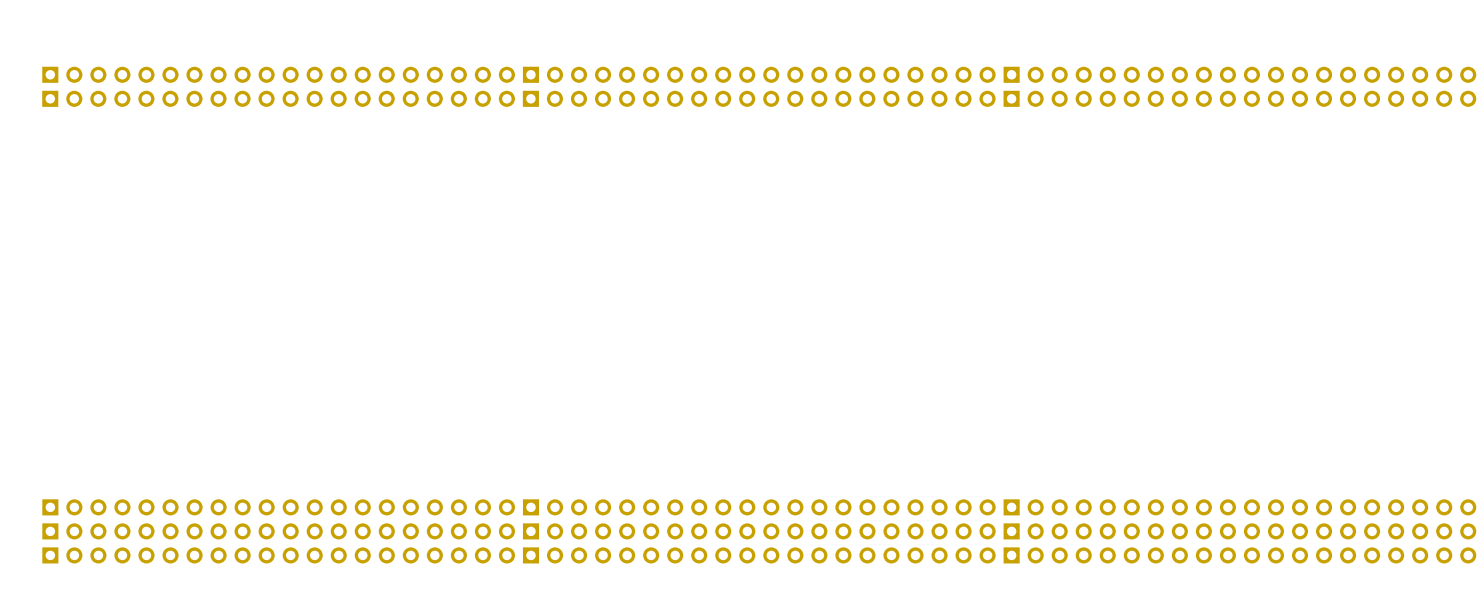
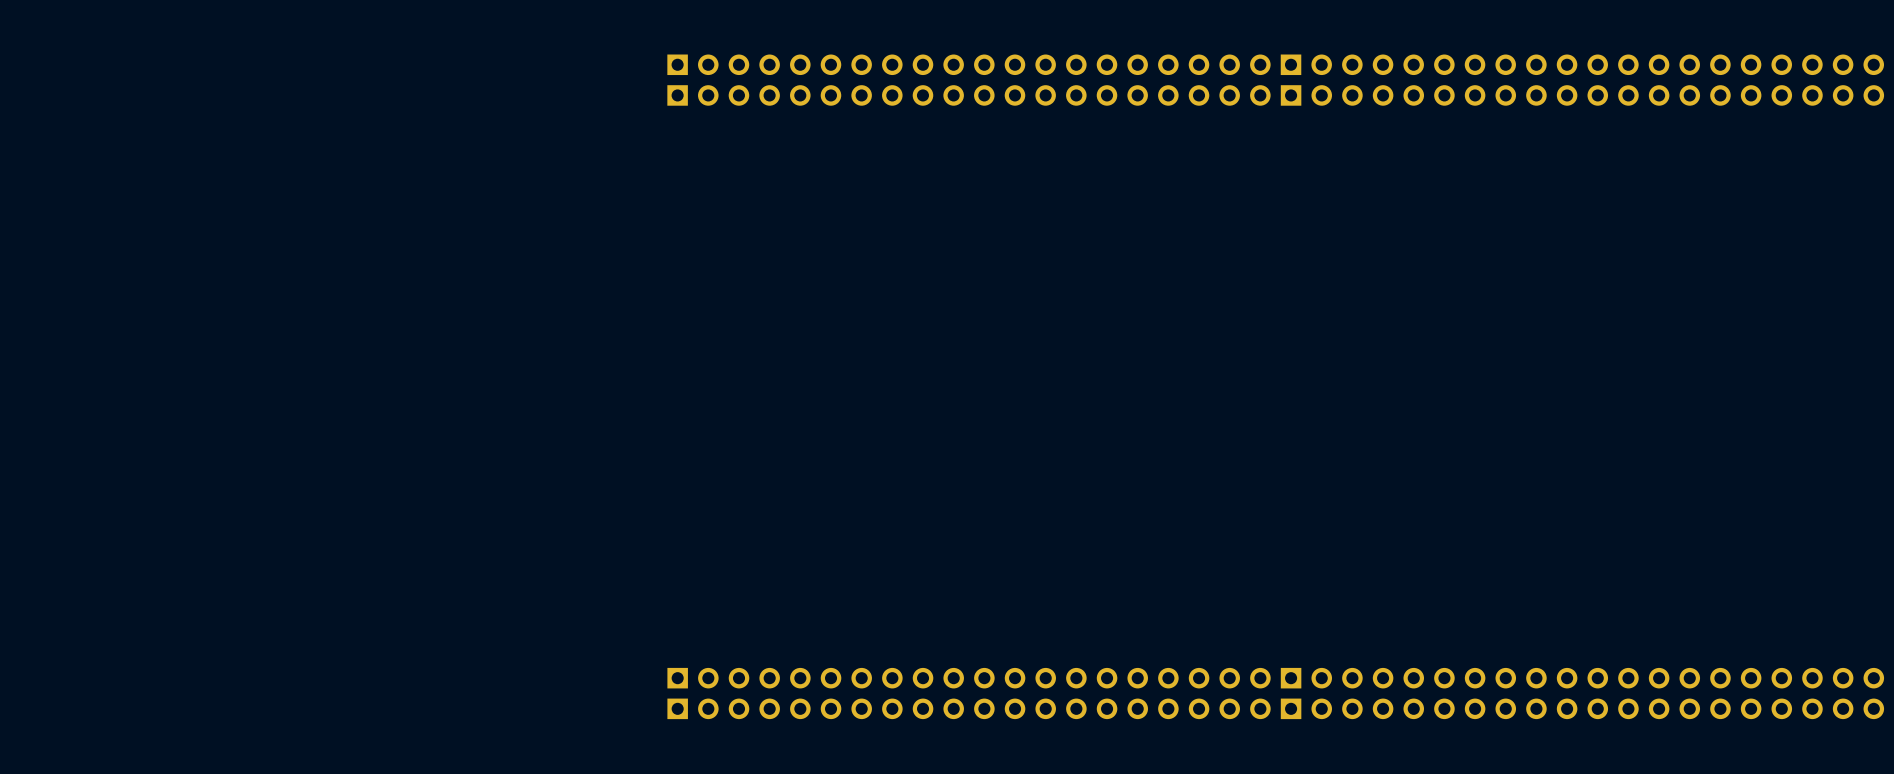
part: (278, 74) -> none
part: (278, 98) -> none
part position: (759, 98) -> (968, 64)
part position: (1239, 98) -> (1582, 64)
part: (278, 507) -> none
part: (759, 507) -> none
part: (1239, 507) -> none
part: (278, 531) -> none
part: (278, 555) -> none

